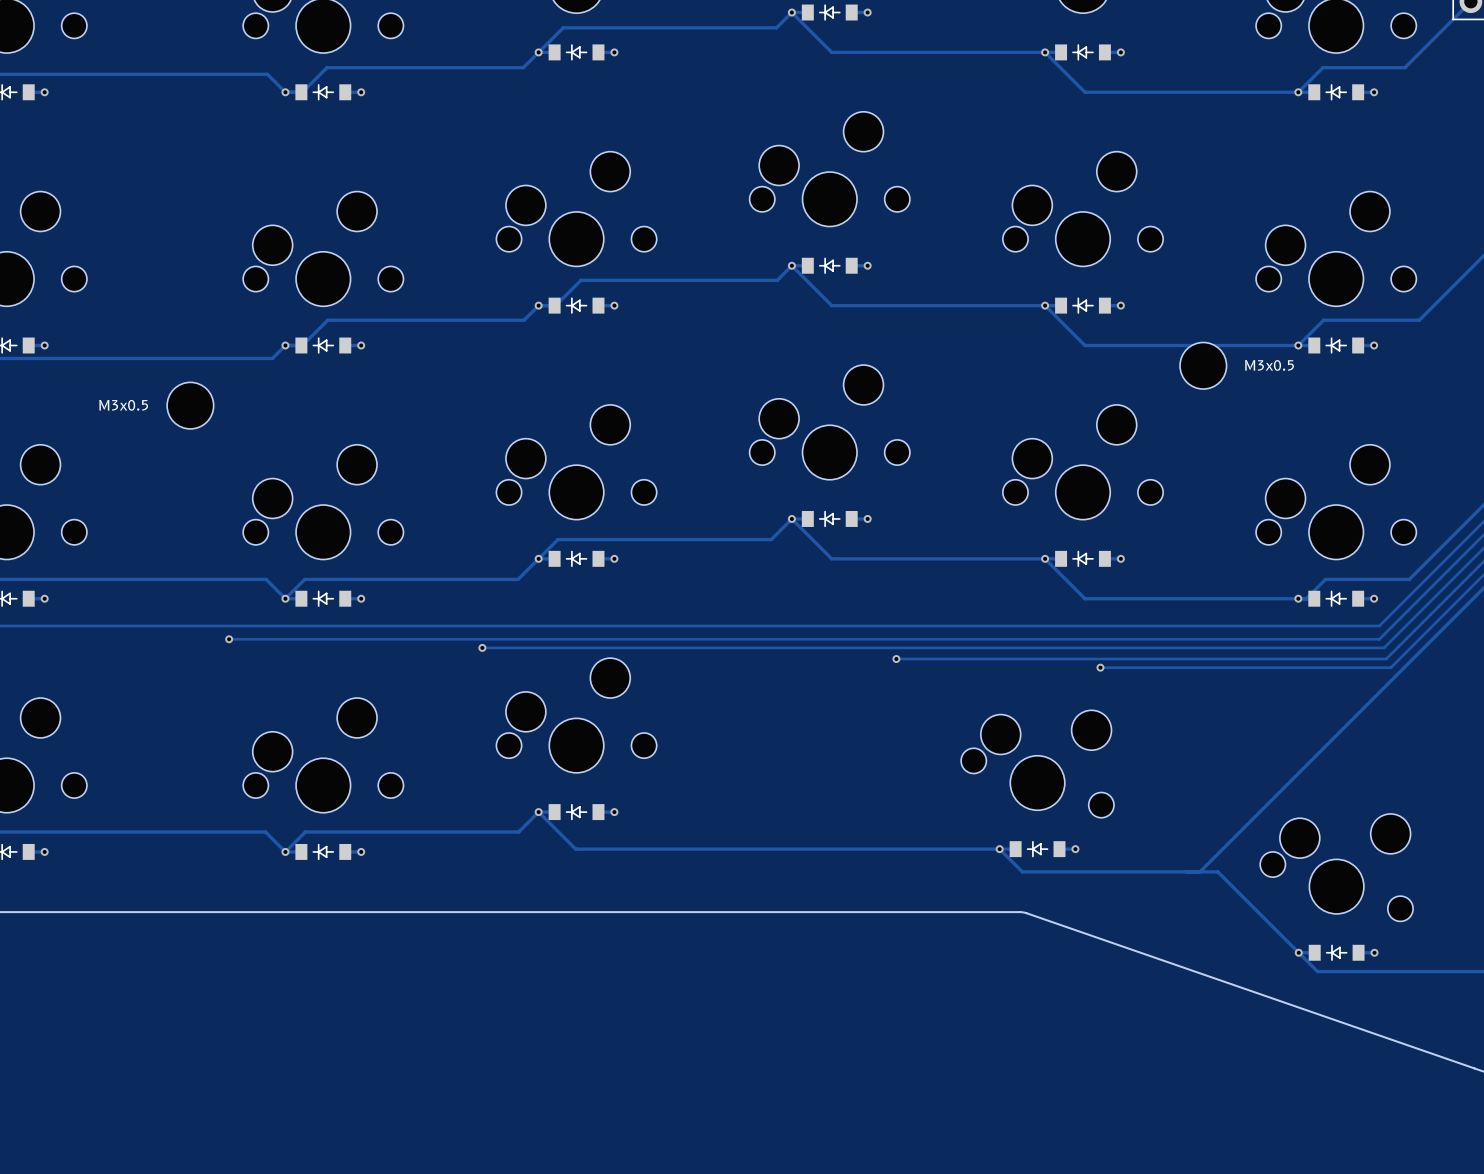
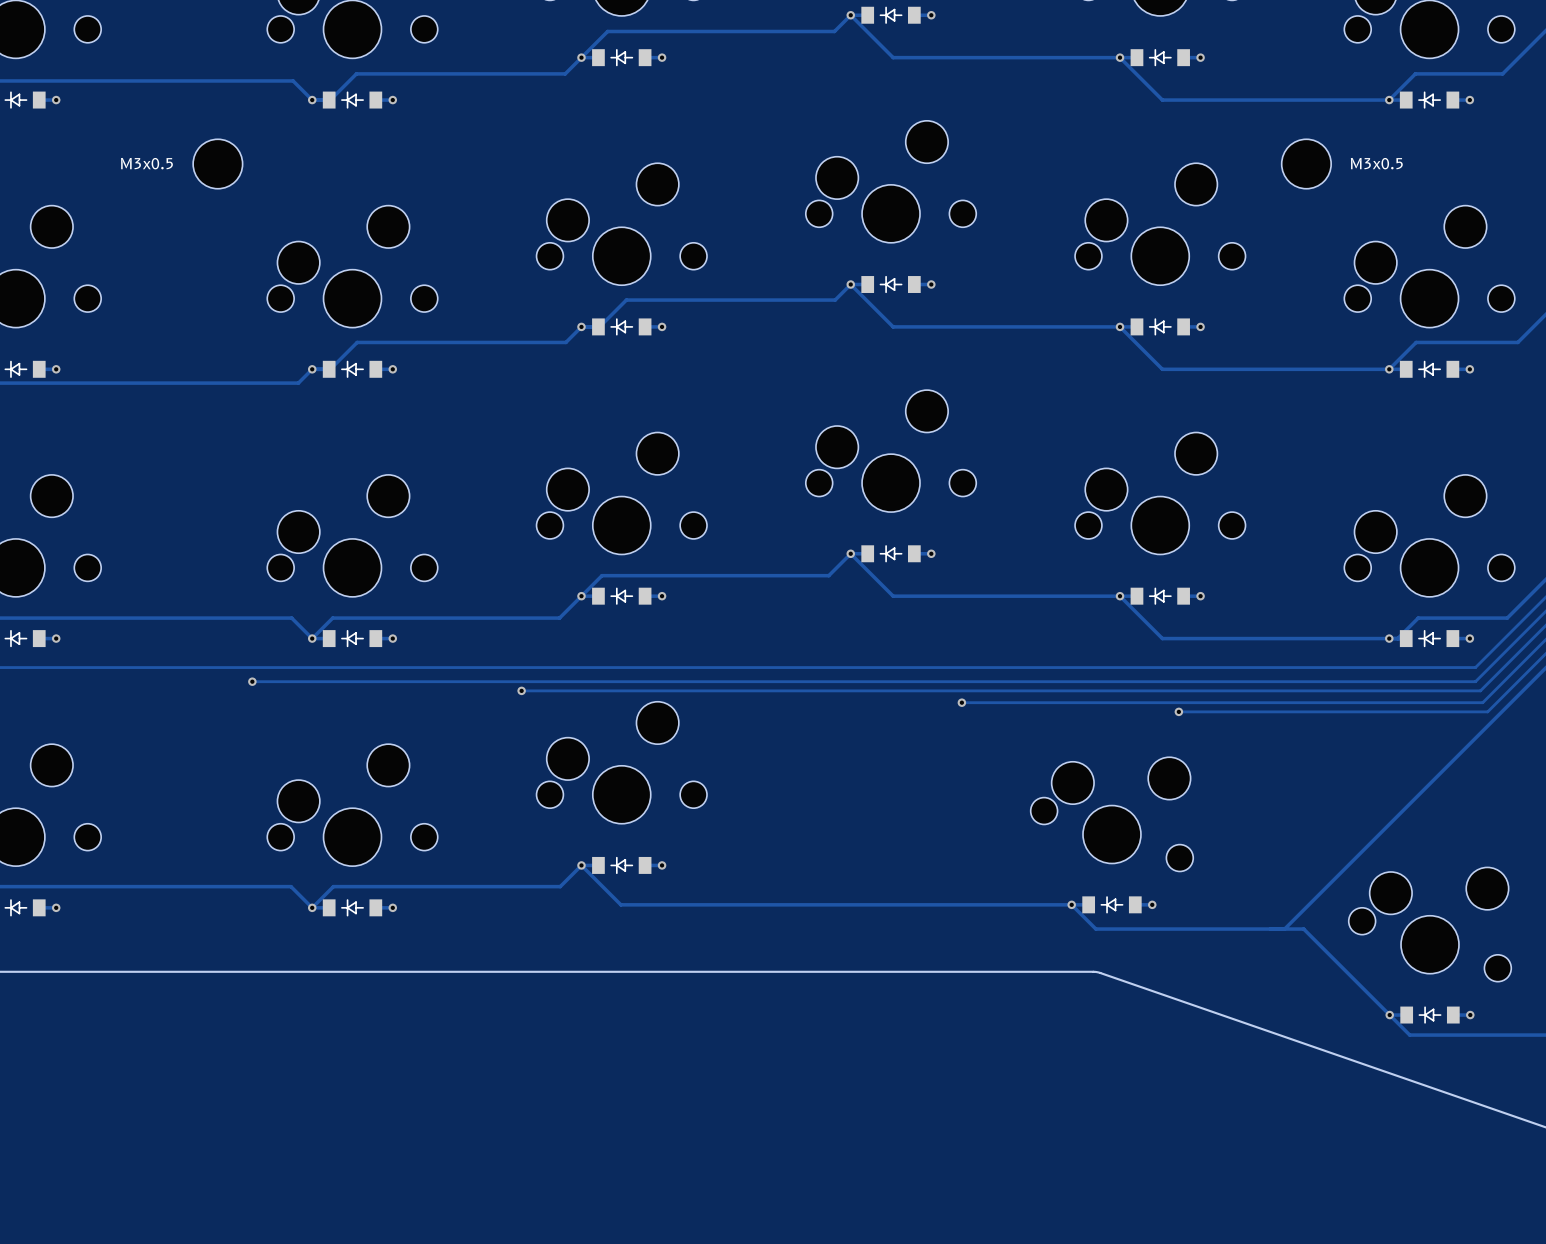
part position: (1203, 365) -> (1306, 164)
text position: M3x0.5 (1269, 365) -> M3x0.5 (1376, 163)
text position: M3x0.5 (123, 405) -> M3x0.5 (146, 163)
part position: (190, 405) -> (217, 164)

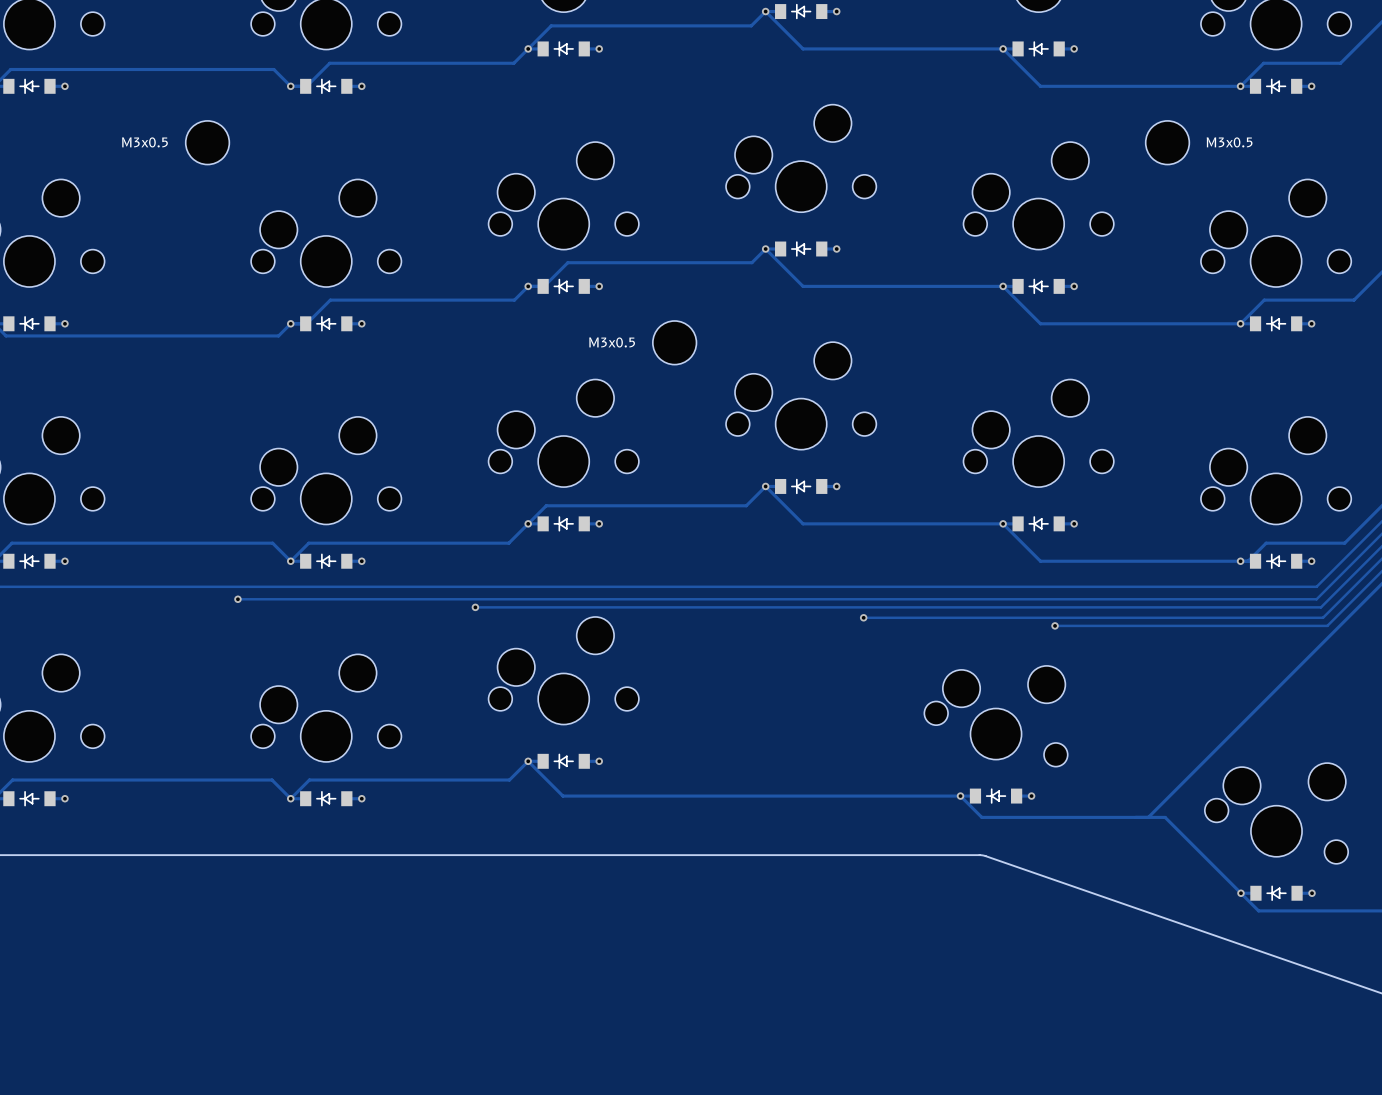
text: none -> M3x0.5 (612, 342)
part: none -> (674, 342)

